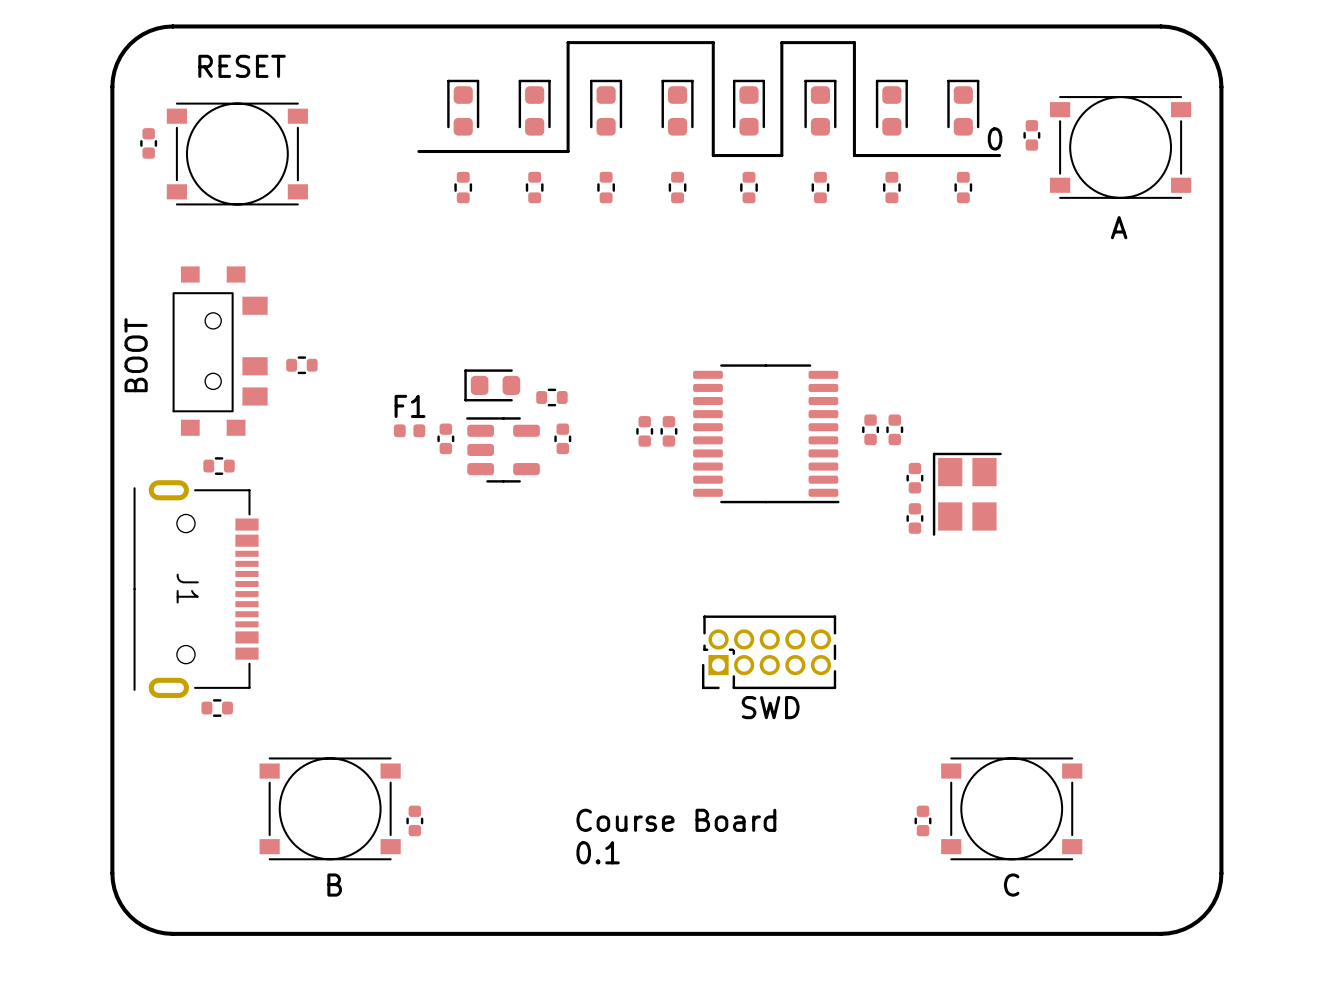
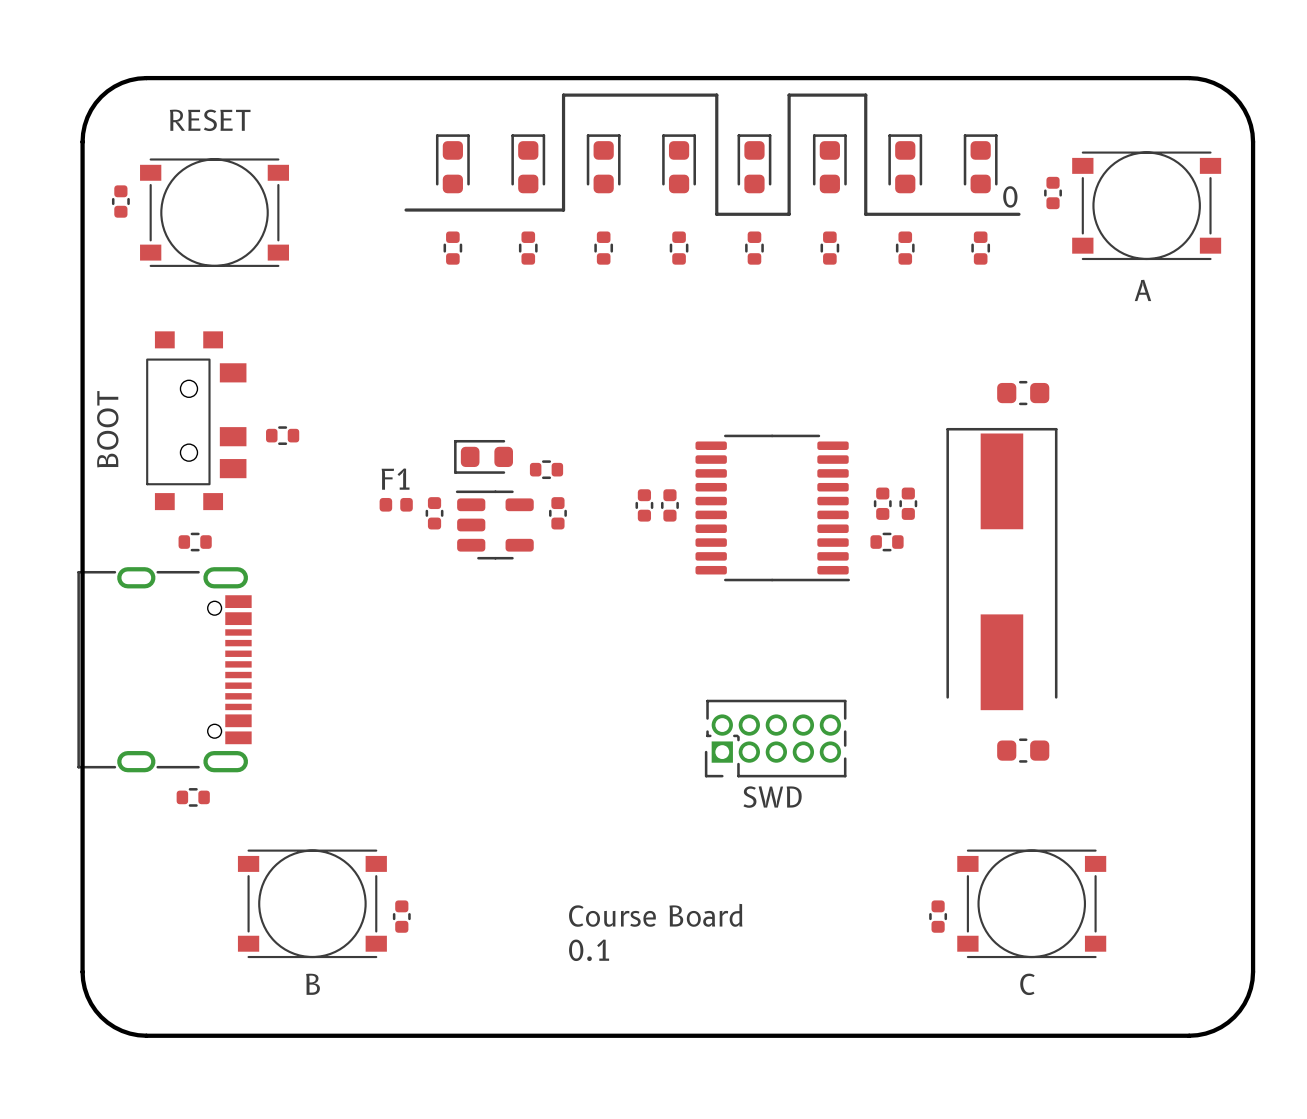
part: none -> (1023, 393)
part footprint: [932, 452, 1002, 536] -> [946, 427, 1058, 711]
part: none -> (887, 542)
part: (914, 478) -> none
part: (914, 518) -> none
part: none -> (164, 669)
J1: (196, 589) -> none
part: none -> (1023, 750)

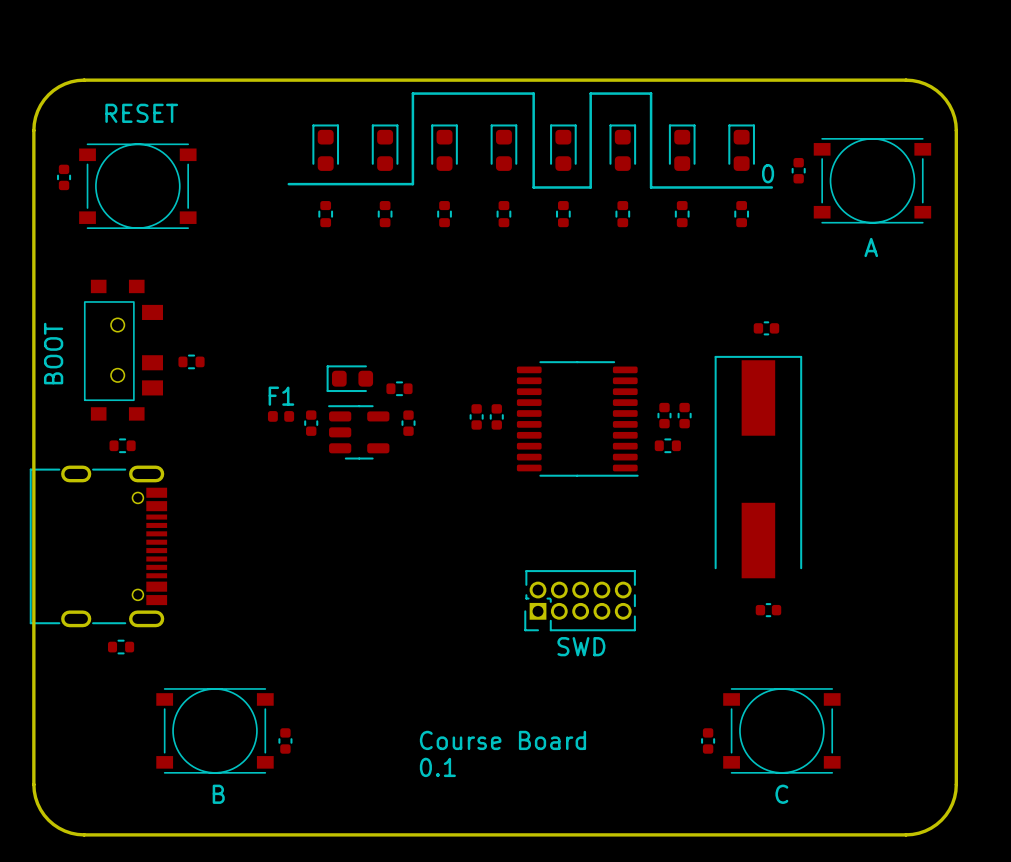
part footprint: [997, 380, 1050, 406] -> [753, 321, 780, 336]
part footprint: [997, 738, 1050, 763] -> [755, 603, 782, 618]

